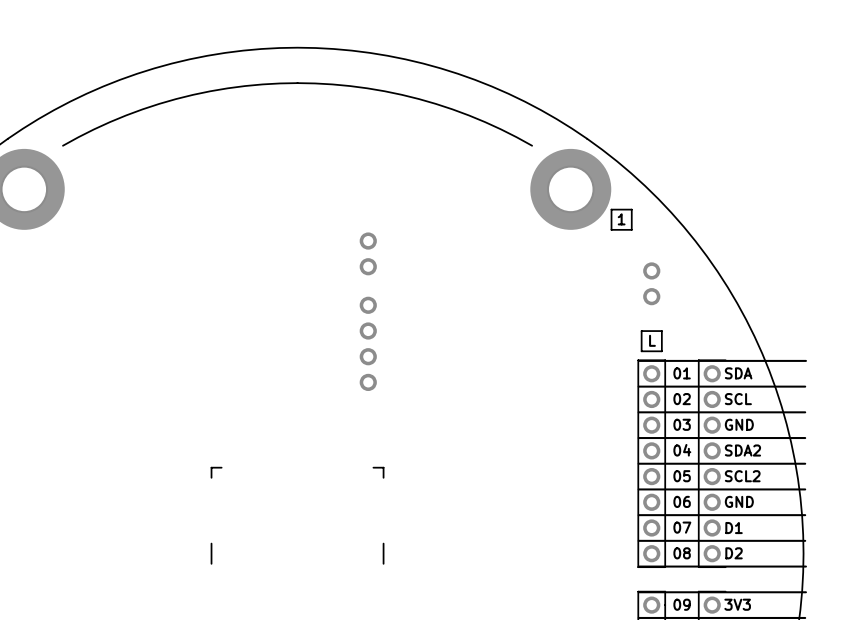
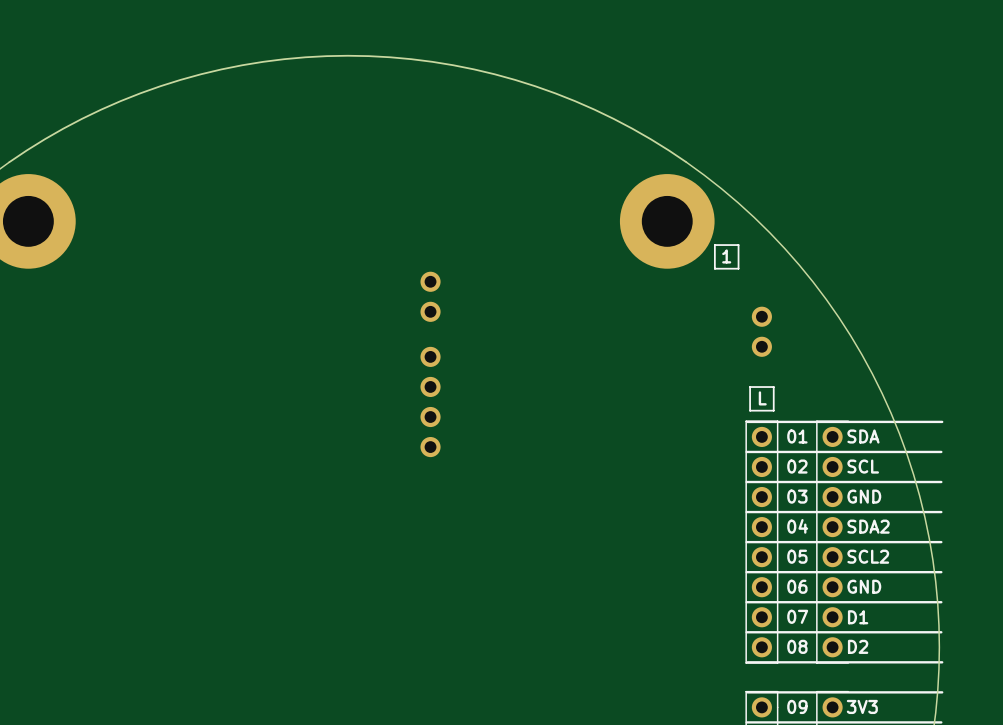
line: (532, 145) (485, 122) (418, 99) (367, 88) (297, 83) (227, 88) (176, 99) (126, 115) (62, 145) -> none
line: (221, 467) (211, 467) (211, 477) -> none
line: (373, 467) (383, 467) (383, 477) -> none
line: (211, 543) (211, 563) -> none
line: (383, 543) (383, 563) -> none

